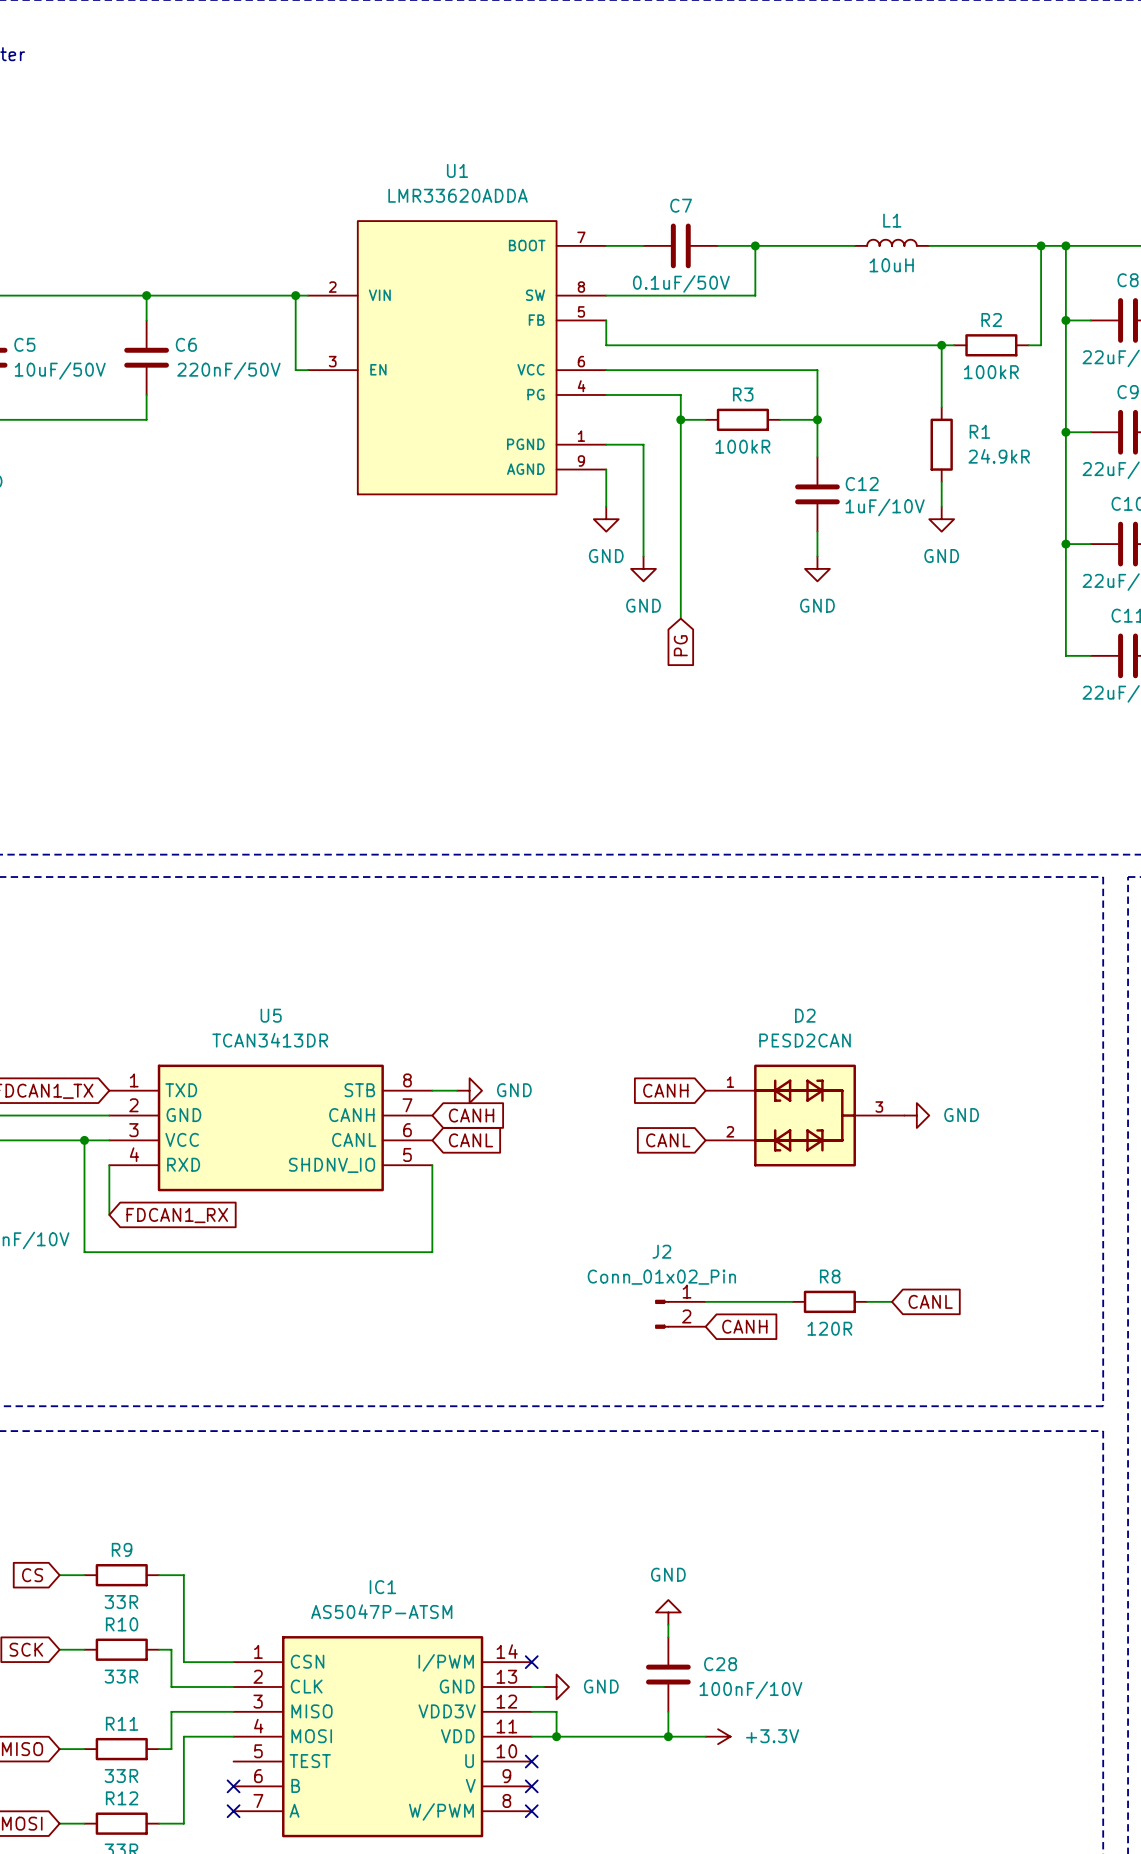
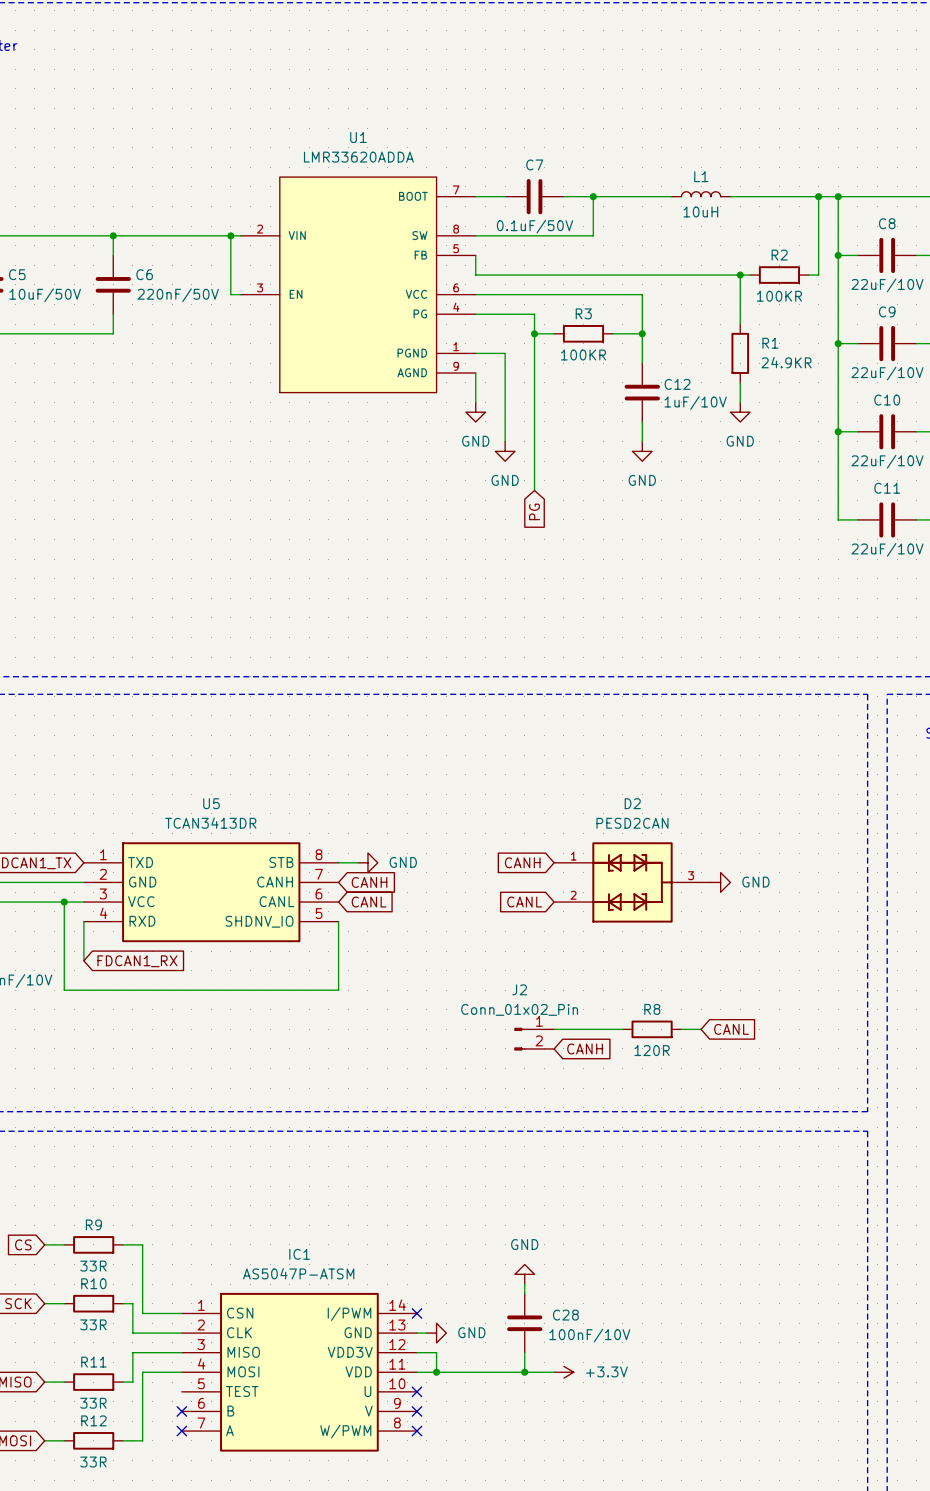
R2 value: 100kR (991, 372) -> 100KR (779, 296)
R3 value: 100kR (742, 446) -> 100KR (583, 355)
R1 value: 24.9kR (999, 456) -> 24.9KR (786, 362)

